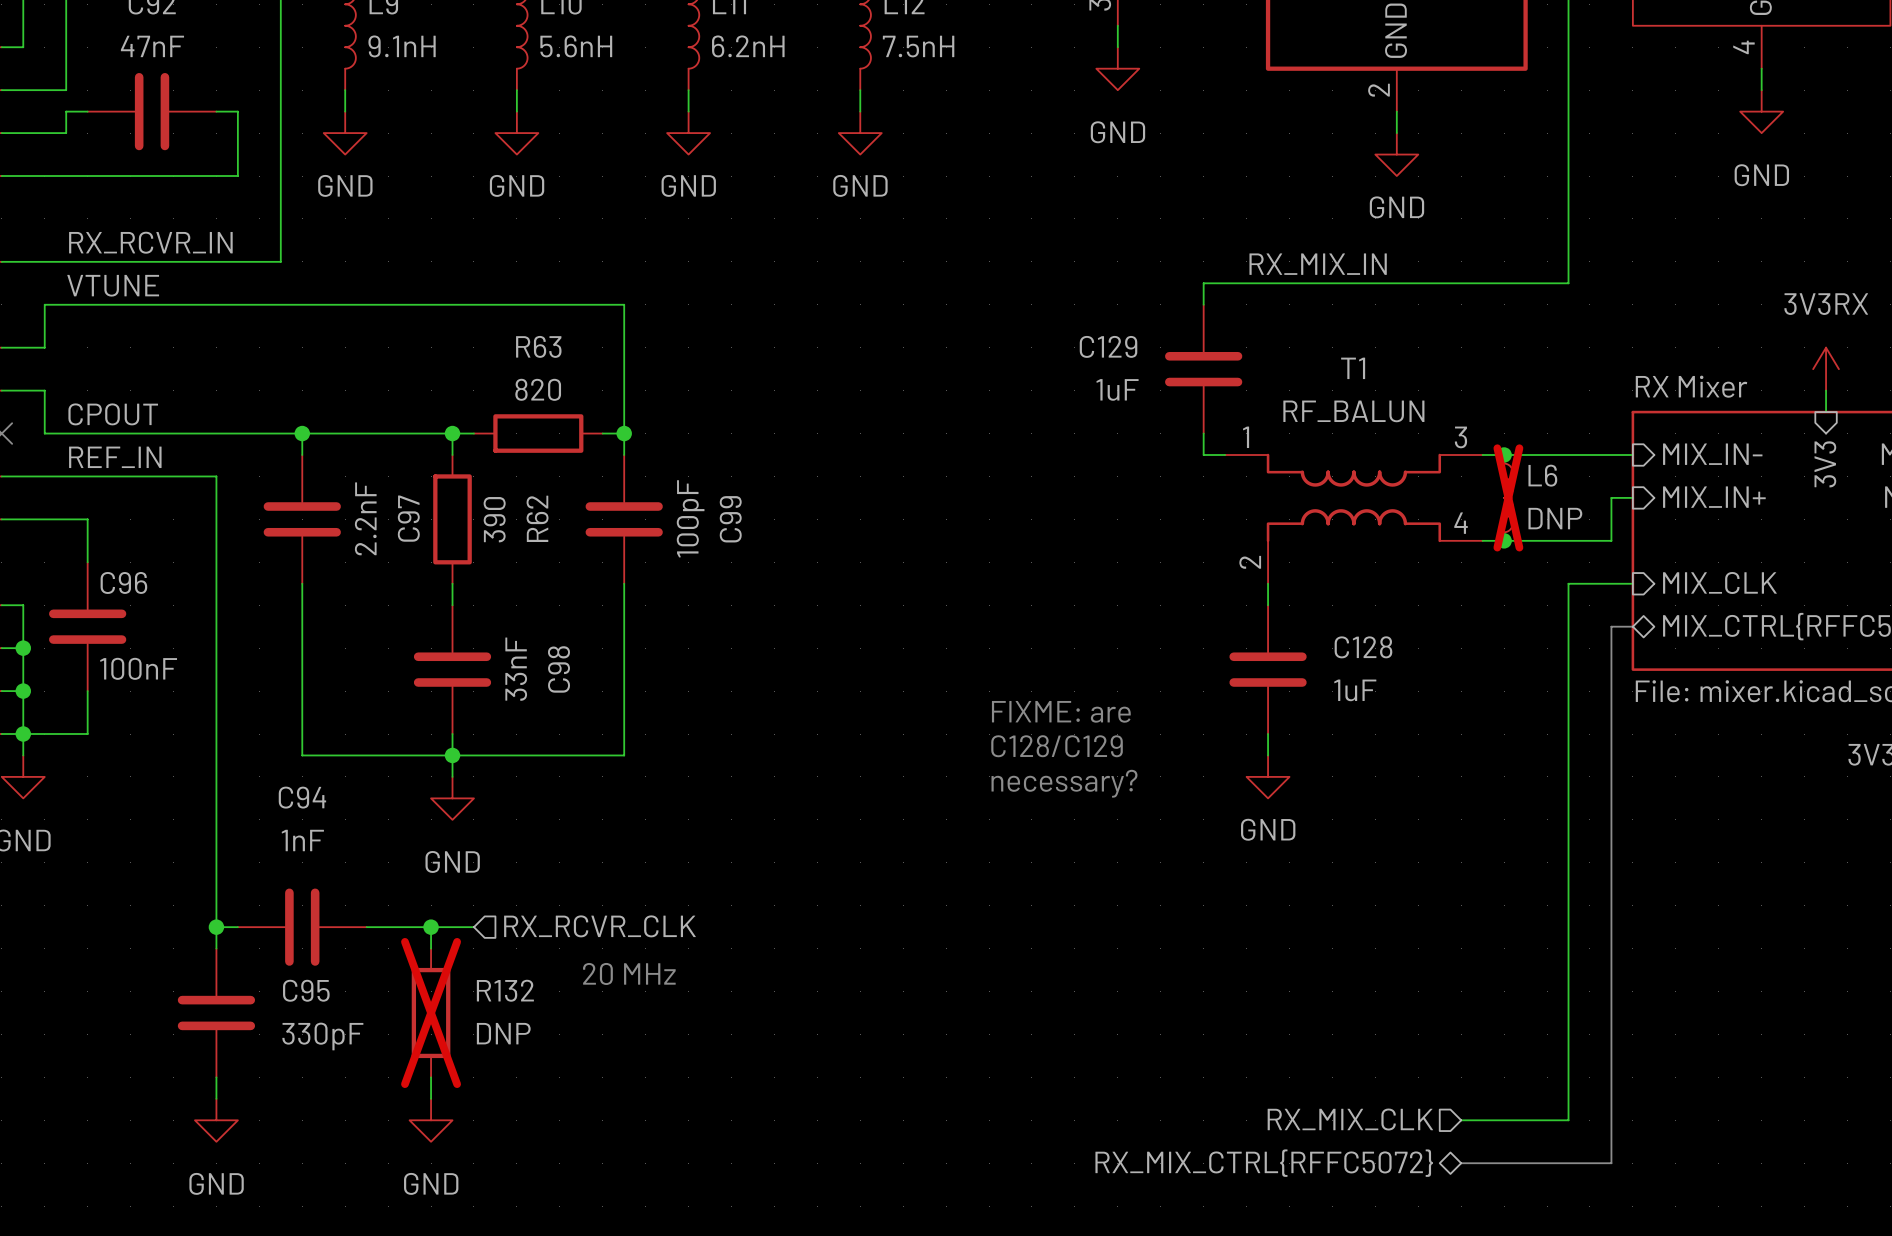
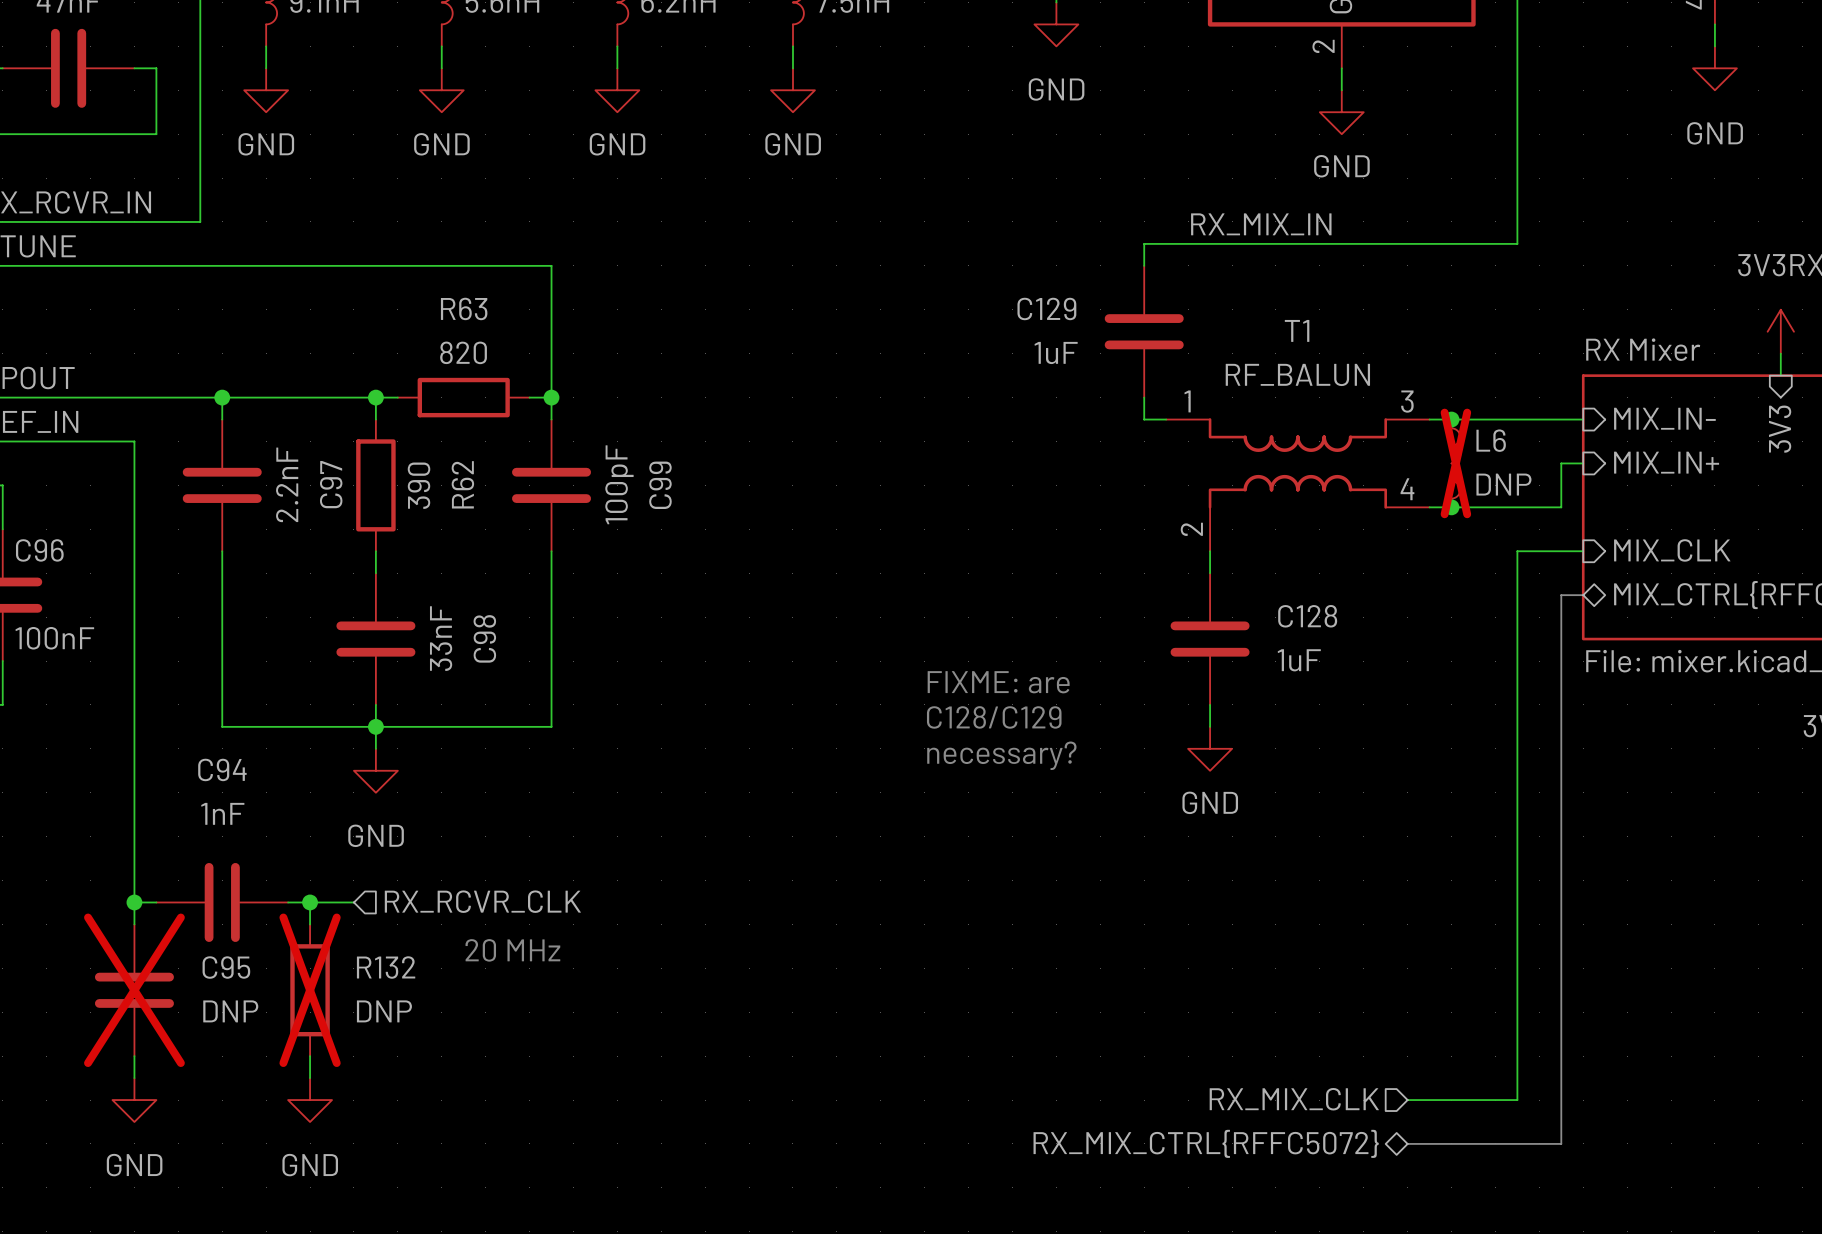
hierarchical label position: RX_RCVR_CLK (599, 926) -> RX_RCVR_CLK (482, 901)
wire: none -> (310, 902) (310, 924)
junction position: (431, 927) -> (310, 902)
wire: (473, 927) (431, 927) (431, 948) -> none
text position: 20 MHz (629, 973) -> 20 MHz (512, 950)
C95 do-not-place cross: none -> (134, 990)
R132 position: (431, 1013) -> (310, 990)
C95 value: 330pF (322, 1036) -> DNP (230, 1011)
wire: (431, 1077) (431, 1098) -> (310, 1056) (310, 1078)
power symbol position: GND (431, 1120) -> GND (310, 1100)

